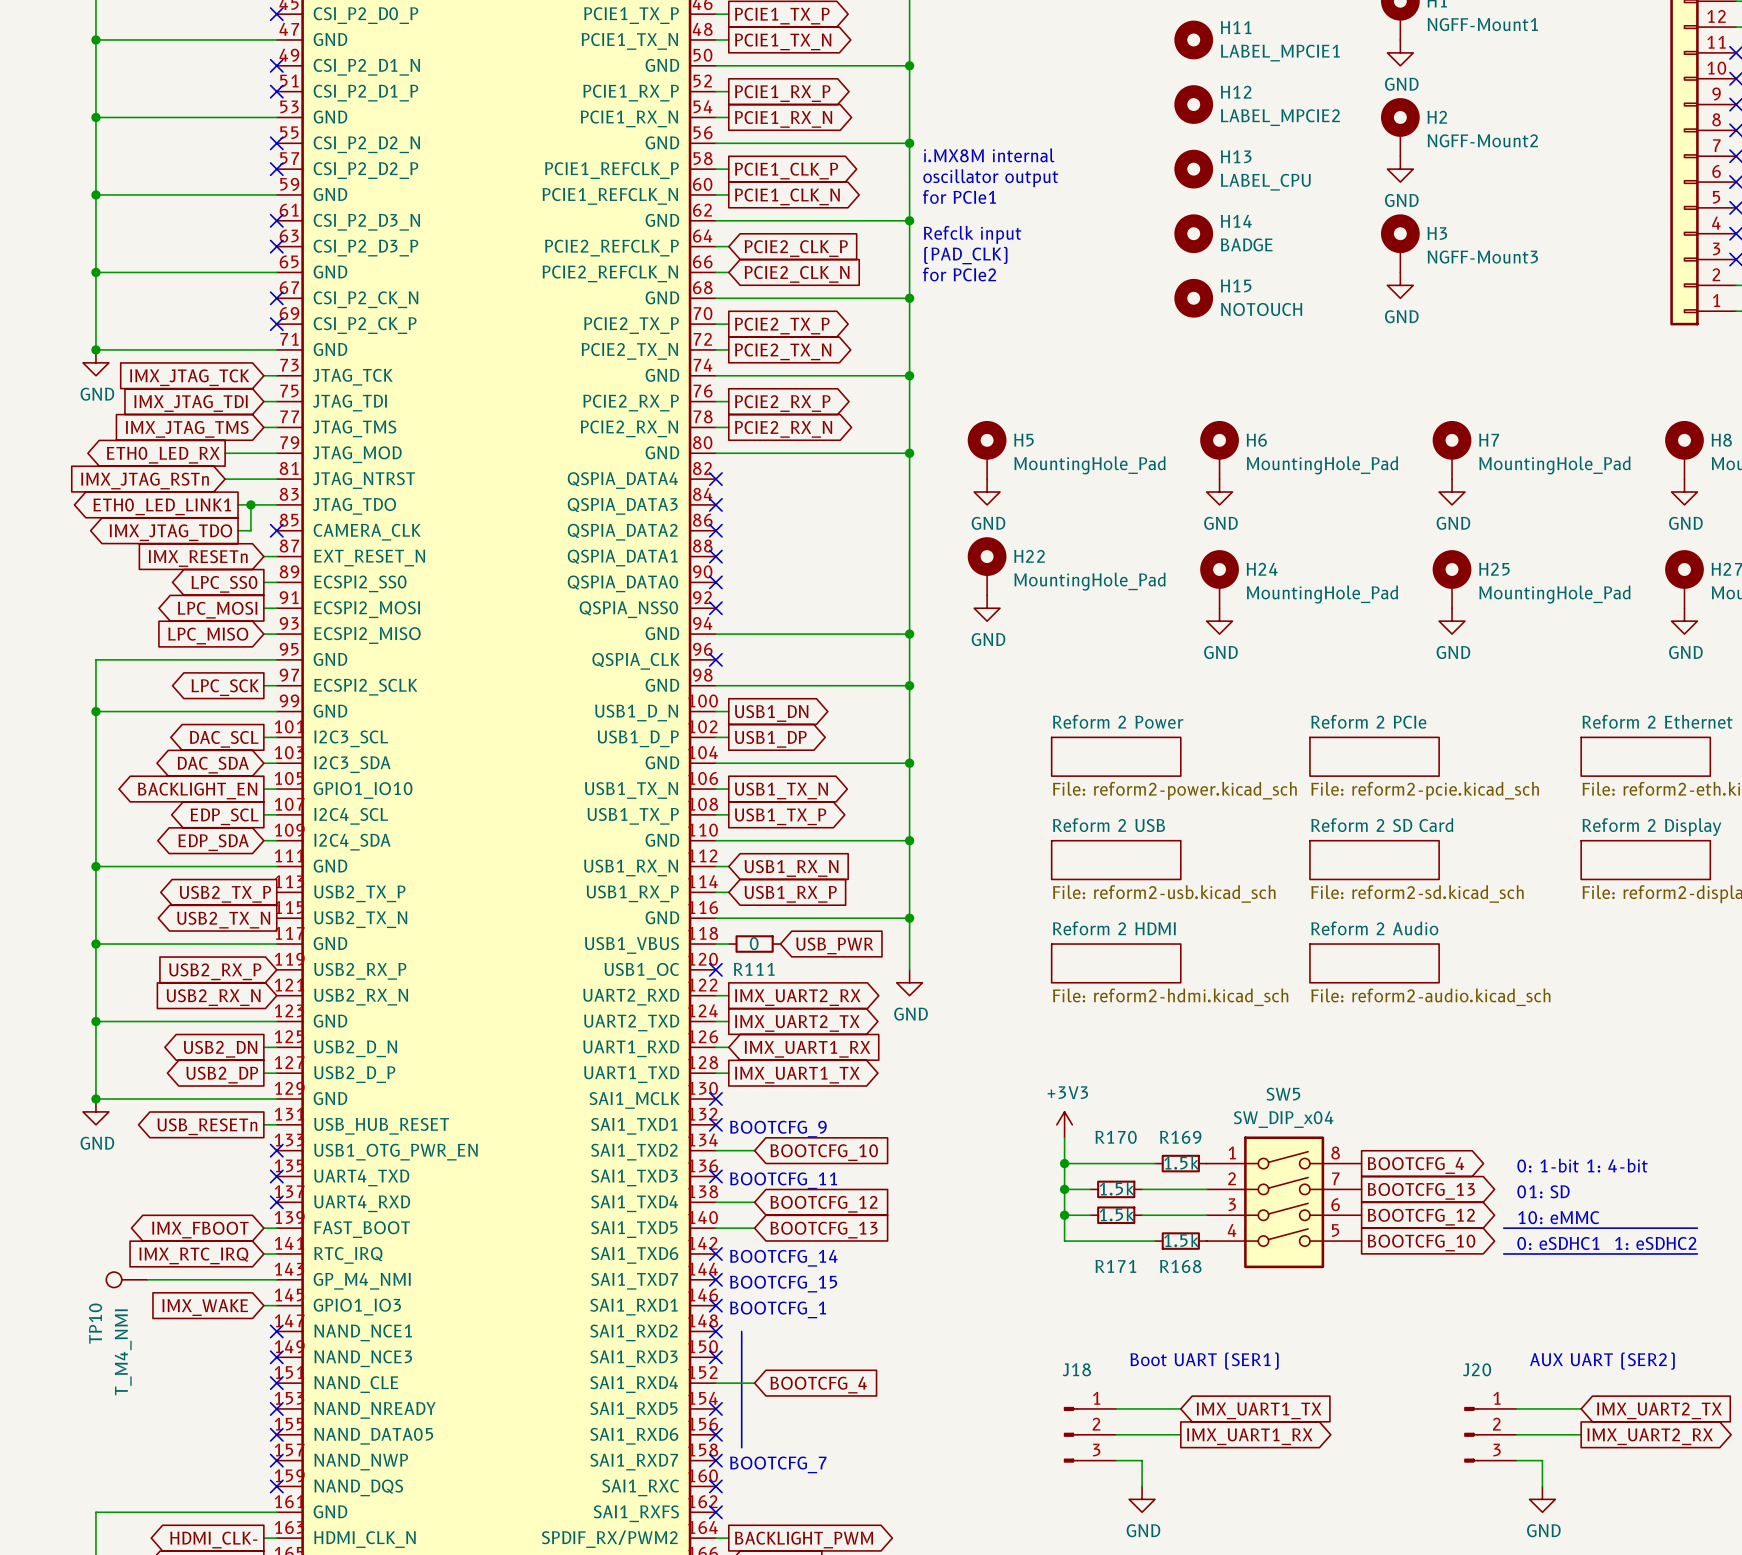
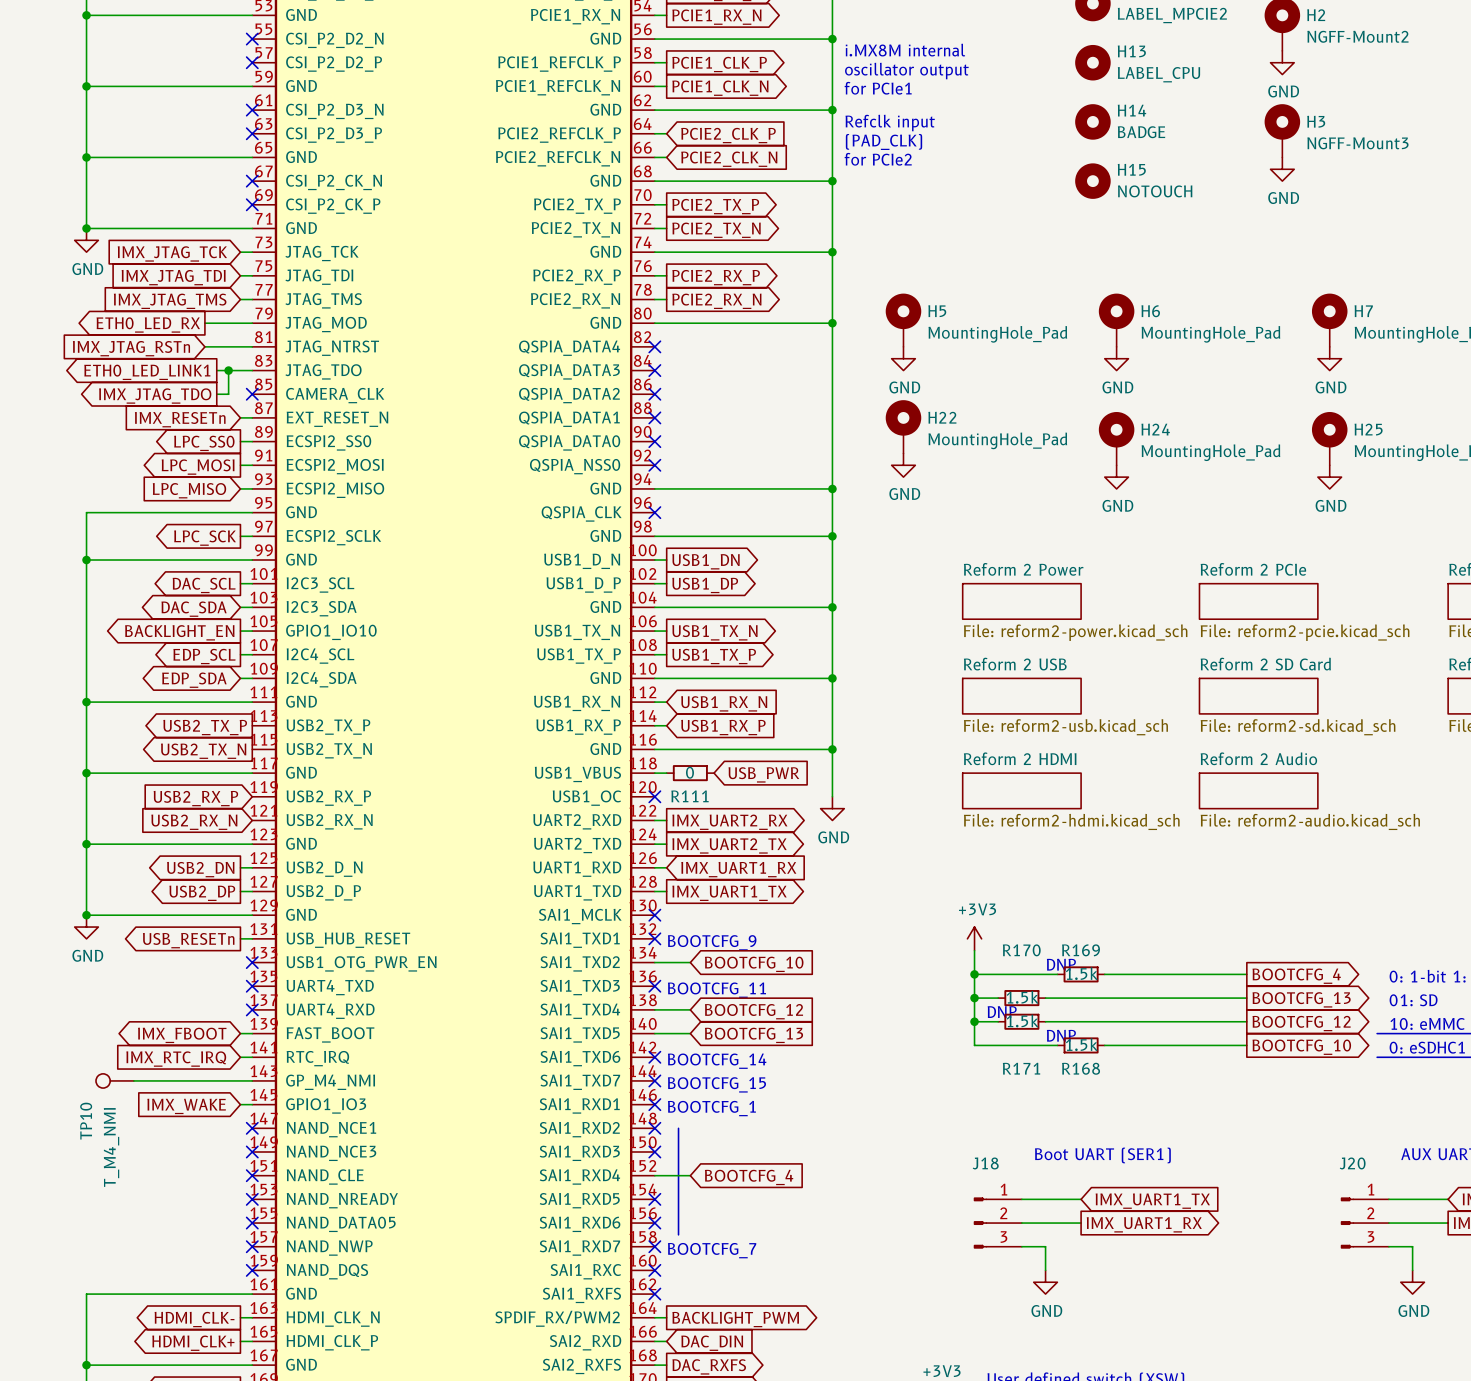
text: none -> DNP (1061, 964)
SW5: SW_DIP_x04 (1284, 1202) -> none
text: none -> DNP (1002, 1012)
text: none -> DNP (1061, 1035)

